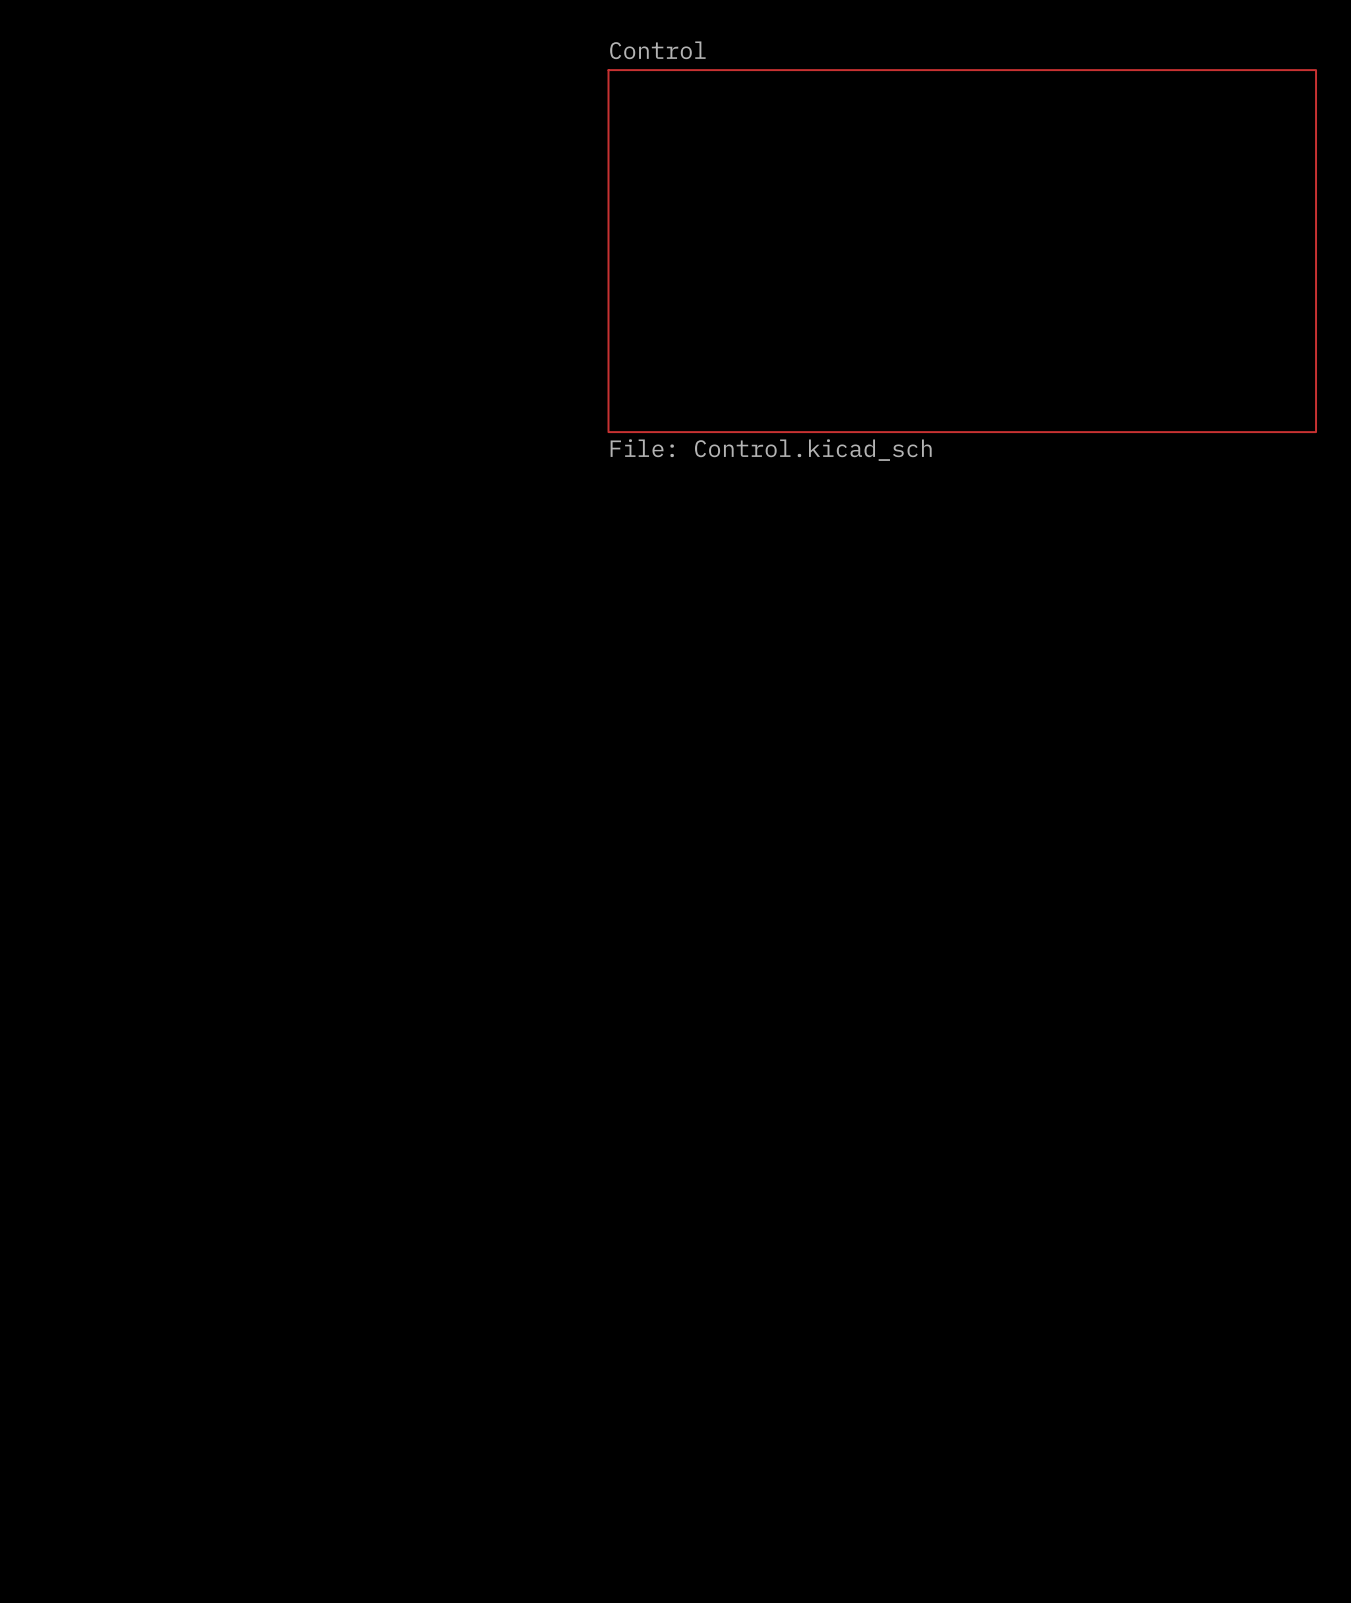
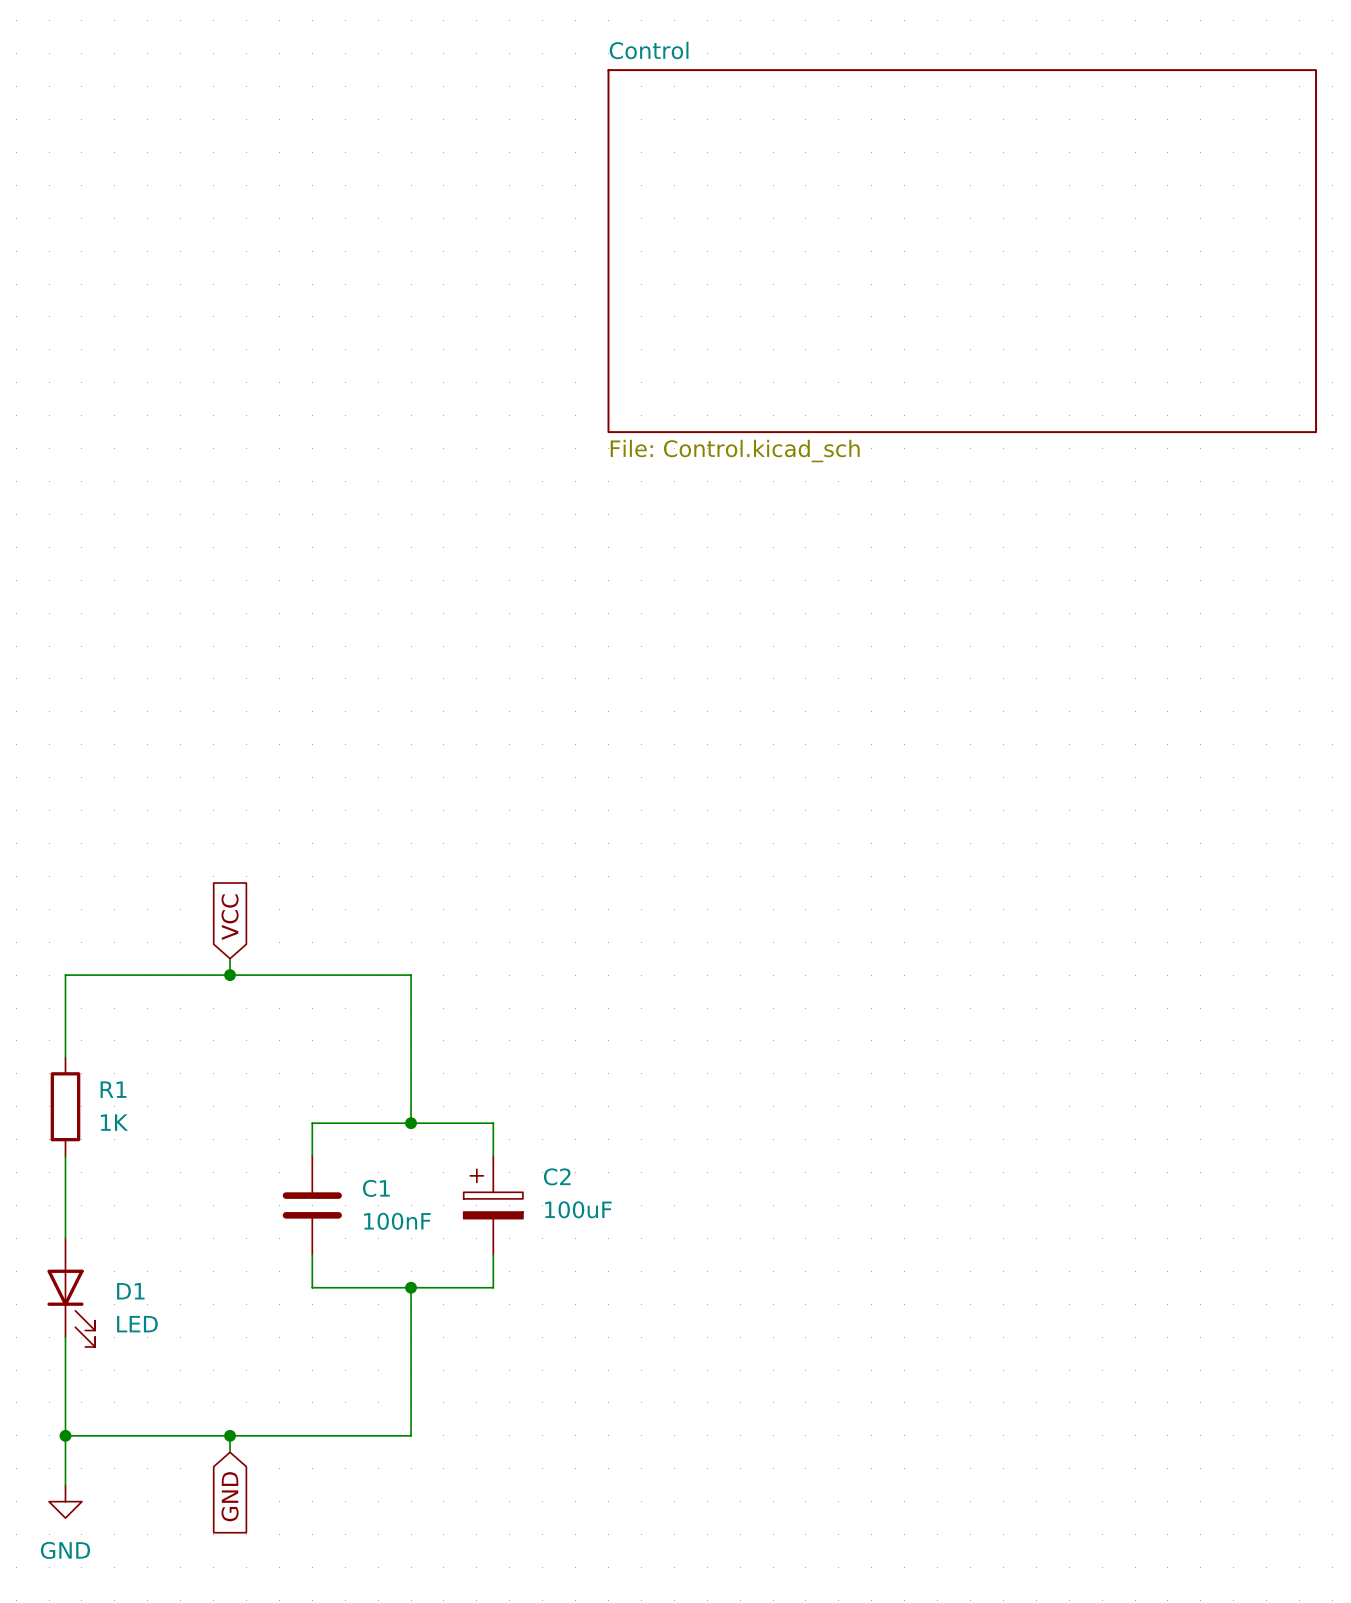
global label: none -> VCC (230, 917)
wire: none -> (230, 958) (230, 975)
junction: none -> (230, 975)
wire: none -> (65, 1057) (65, 975) (411, 975) (411, 1123)
R1: none -> 1K (65, 1106)
junction: none -> (411, 1123)
wire: none -> (65, 1156) (65, 1238)
wire: none -> (312, 1156) (312, 1123) (493, 1123) (493, 1156)
C1: none -> 100nF (312, 1205)
C2: none -> 100uF (493, 1205)
wire: none -> (312, 1254) (312, 1287) (493, 1287) (493, 1254)
wire: none -> (411, 1287) (411, 1435) (65, 1435)
junction: none -> (411, 1287)
D1: none -> LED (71, 1292)
wire: none -> (65, 1337) (65, 1485)
junction: none -> (65, 1435)
wire: none -> (230, 1435) (230, 1452)
junction: none -> (230, 1435)
global label: none -> GND (230, 1496)
power symbol: none -> GND (65, 1501)

